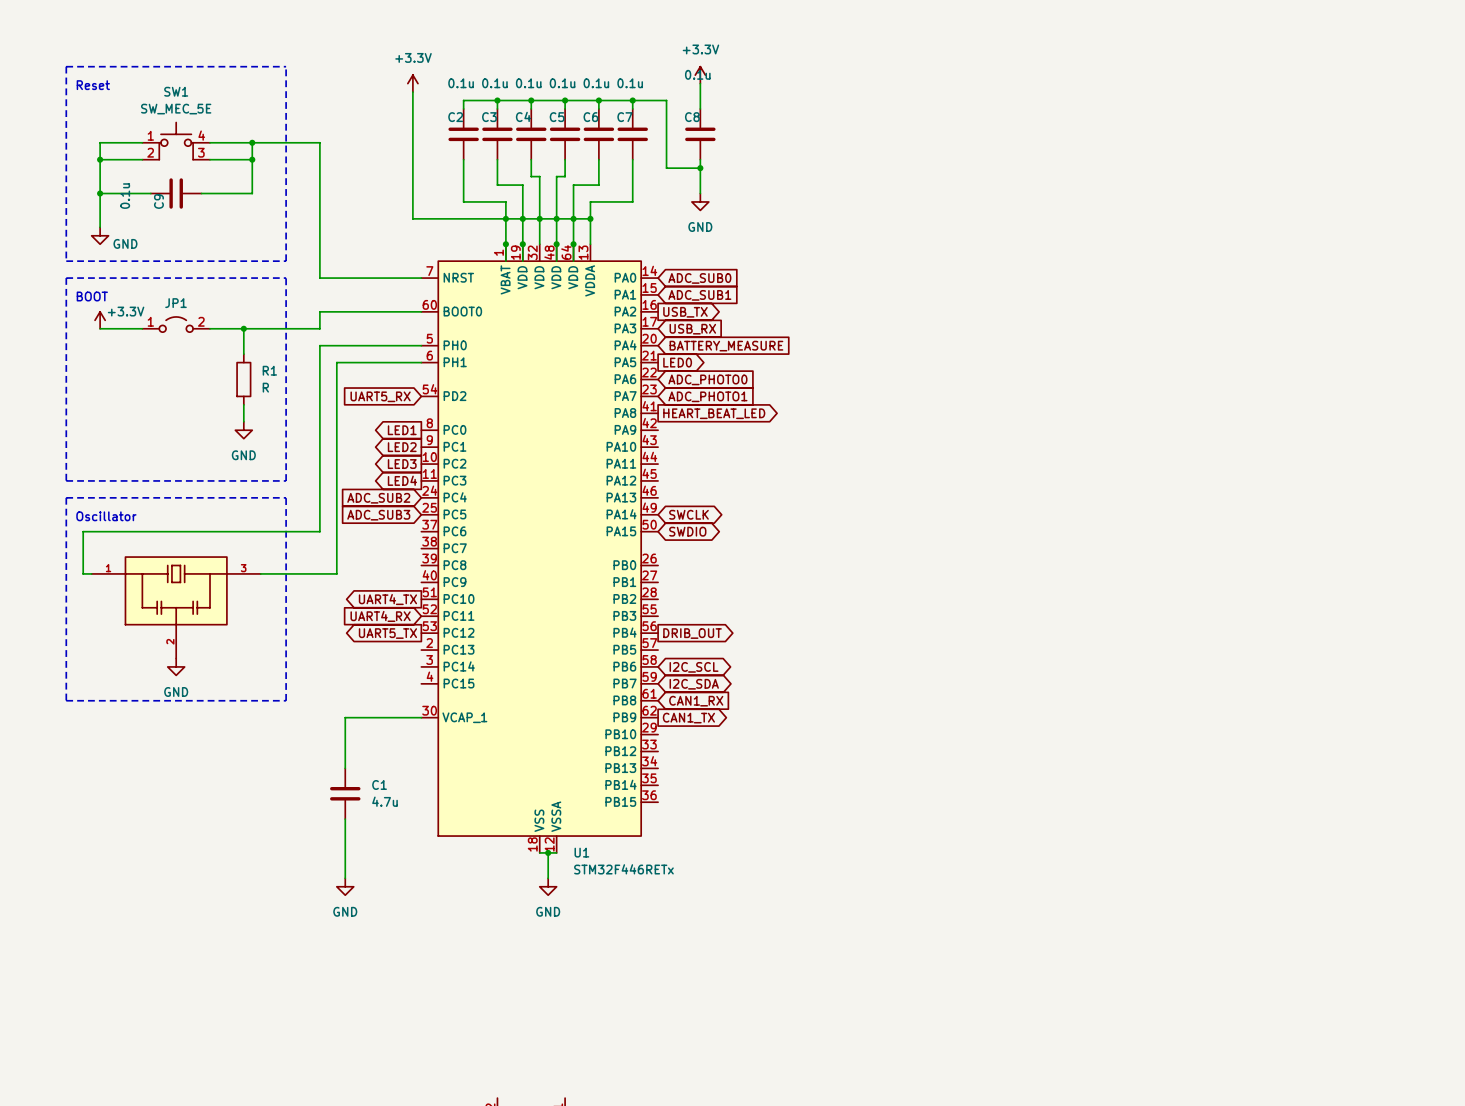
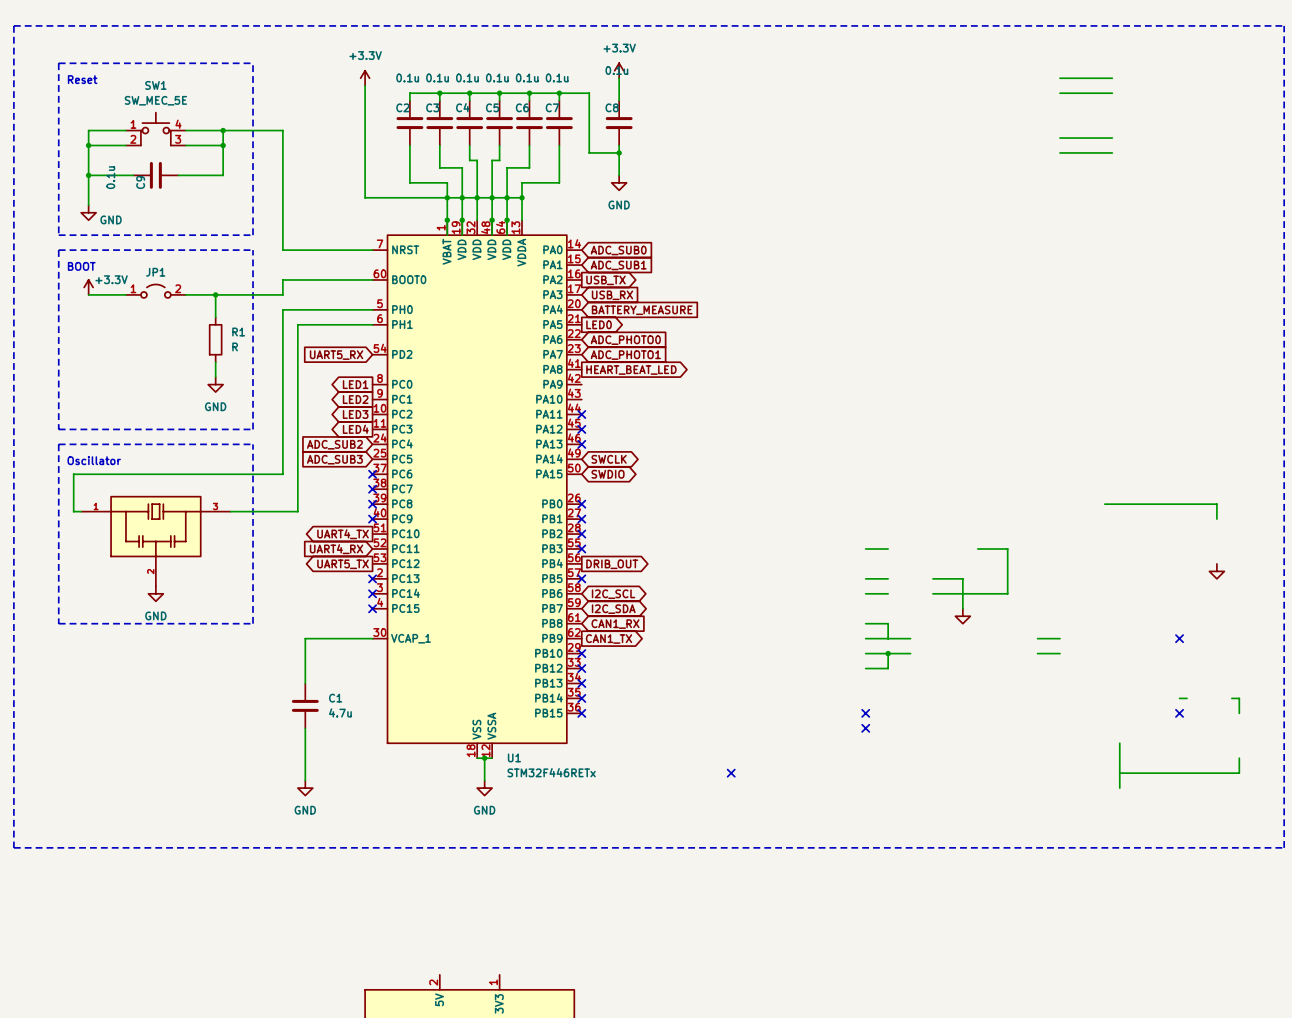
line: none -> (13, 25) (13, 847) (1284, 847) (1284, 25) (13, 25)
wire: none -> (1059, 78) (1112, 78)
wire: none -> (1059, 93) (1112, 93)
wire: none -> (1059, 138) (1112, 138)
wire: none -> (1059, 152) (1112, 152)
no-connect mark: none -> (581, 414)
no-connect mark: none -> (581, 429)
no-connect mark: none -> (581, 444)
no-connect mark: none -> (372, 474)
no-connect mark: none -> (372, 489)
no-connect mark: none -> (372, 504)
no-connect mark: none -> (581, 504)
wire: none -> (1104, 504) (1216, 504) (1216, 519)
no-connect mark: none -> (372, 519)
no-connect mark: none -> (581, 519)
no-connect mark: none -> (581, 534)
no-connect mark: none -> (581, 548)
wire: none -> (865, 548) (888, 548)
wire: none -> (977, 548) (1007, 548) (1007, 593) (932, 593)
power symbol: none -> (1216, 571)
no-connect mark: none -> (372, 578)
no-connect mark: none -> (581, 578)
wire: none -> (865, 578) (888, 578)
wire: none -> (932, 578) (962, 578) (962, 608)
no-connect mark: none -> (372, 593)
wire: none -> (865, 593) (888, 593)
no-connect mark: none -> (372, 608)
power symbol: none -> (962, 616)
wire: none -> (865, 623) (888, 623) (888, 638)
wire: none -> (865, 638) (910, 638)
wire: none -> (1037, 638) (1059, 638)
no-connect mark: none -> (1179, 638)
no-connect mark: none -> (581, 653)
wire: none -> (865, 653) (910, 653)
wire: none -> (888, 653) (888, 668) (865, 668)
junction: none -> (888, 653)
wire: none -> (1037, 653) (1059, 653)
no-connect mark: none -> (581, 668)
no-connect mark: none -> (581, 683)
no-connect mark: none -> (581, 698)
wire: none -> (1179, 698) (1187, 698)
wire: none -> (1231, 698) (1239, 698) (1239, 713)
no-connect mark: none -> (581, 713)
no-connect mark: none -> (865, 713)
no-connect mark: none -> (1179, 713)
no-connect mark: none -> (865, 728)
wire: none -> (1119, 743) (1119, 788)
wire: none -> (1239, 758) (1239, 773) (1119, 773)
no-connect mark: none -> (731, 773)

